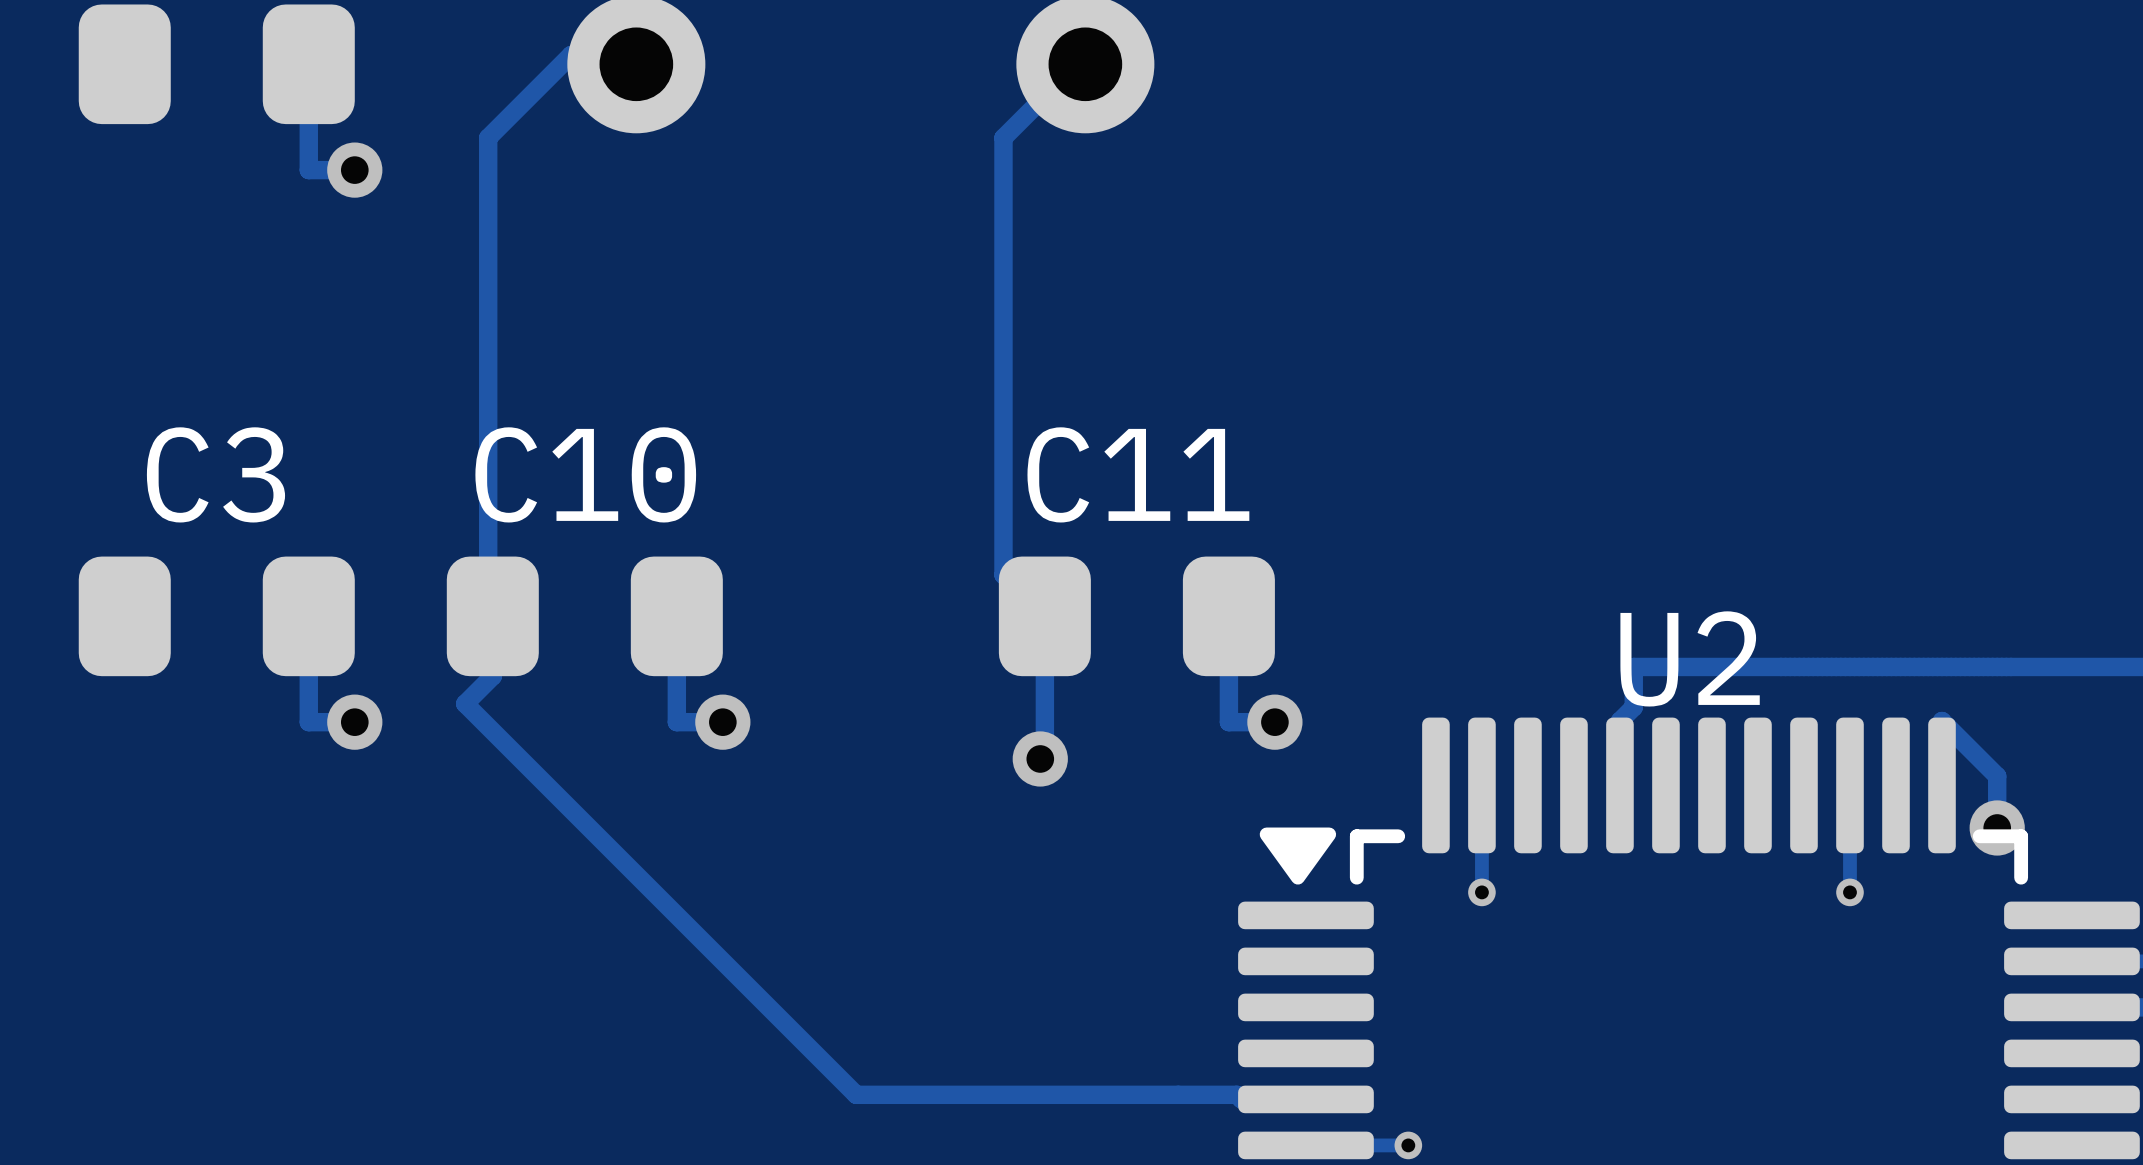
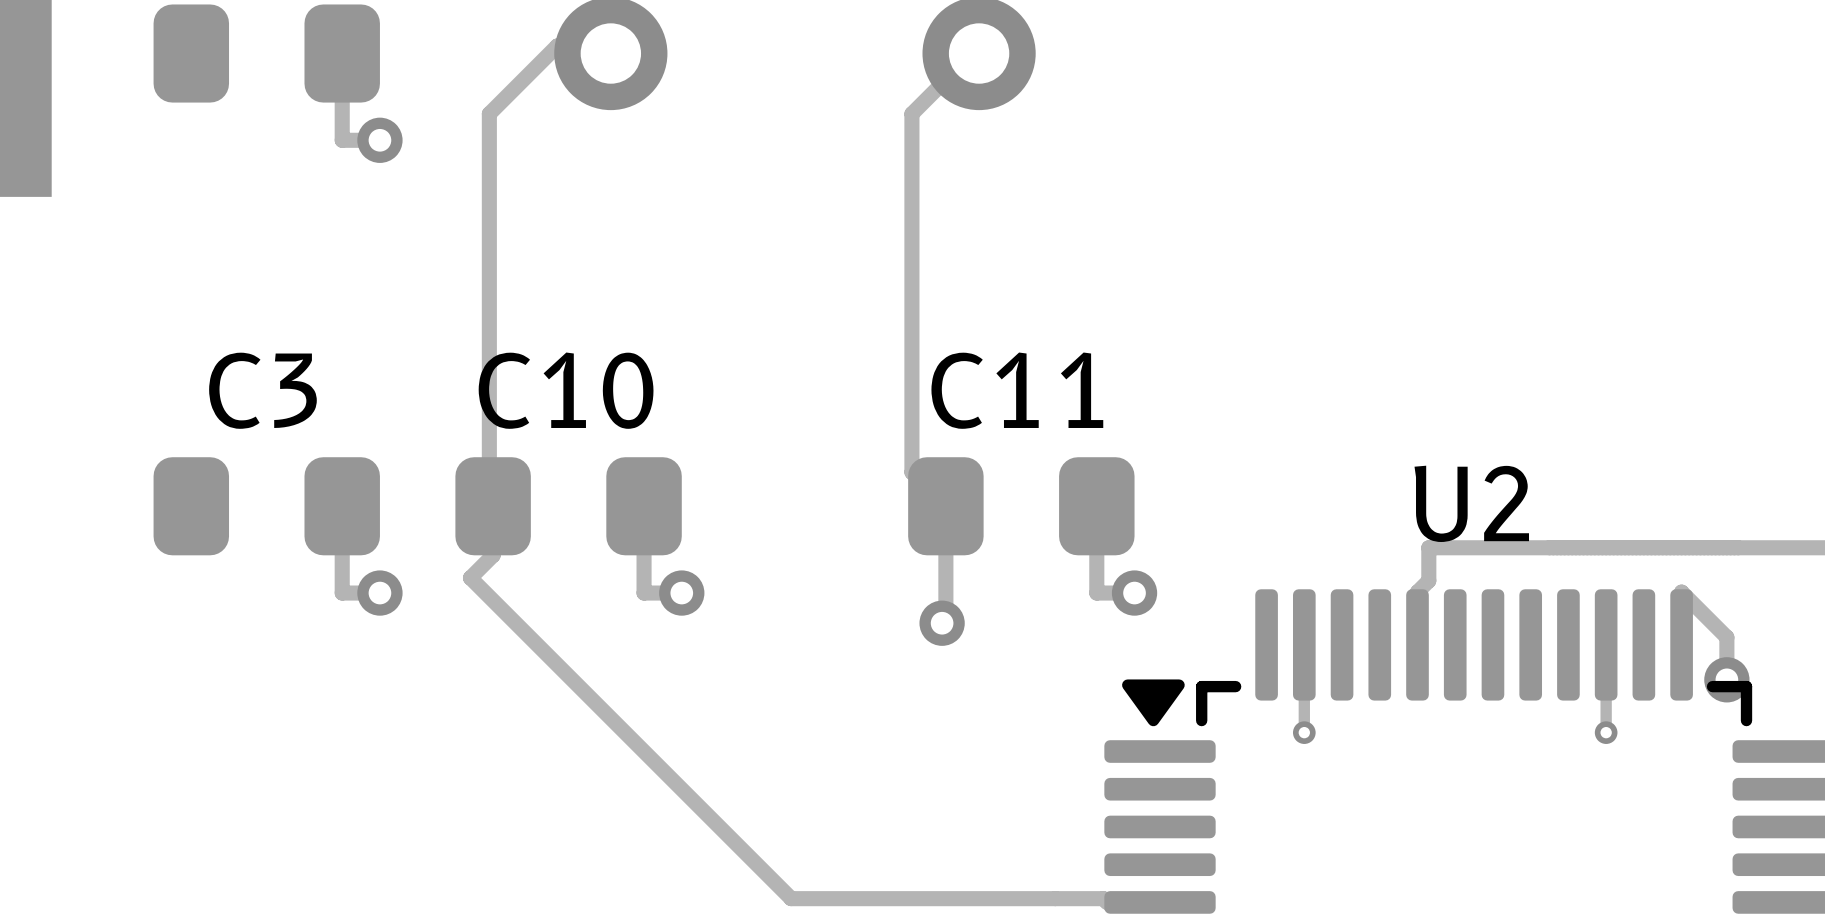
U2 name position: U2 (1690, 658) -> U2 (1471, 503)

